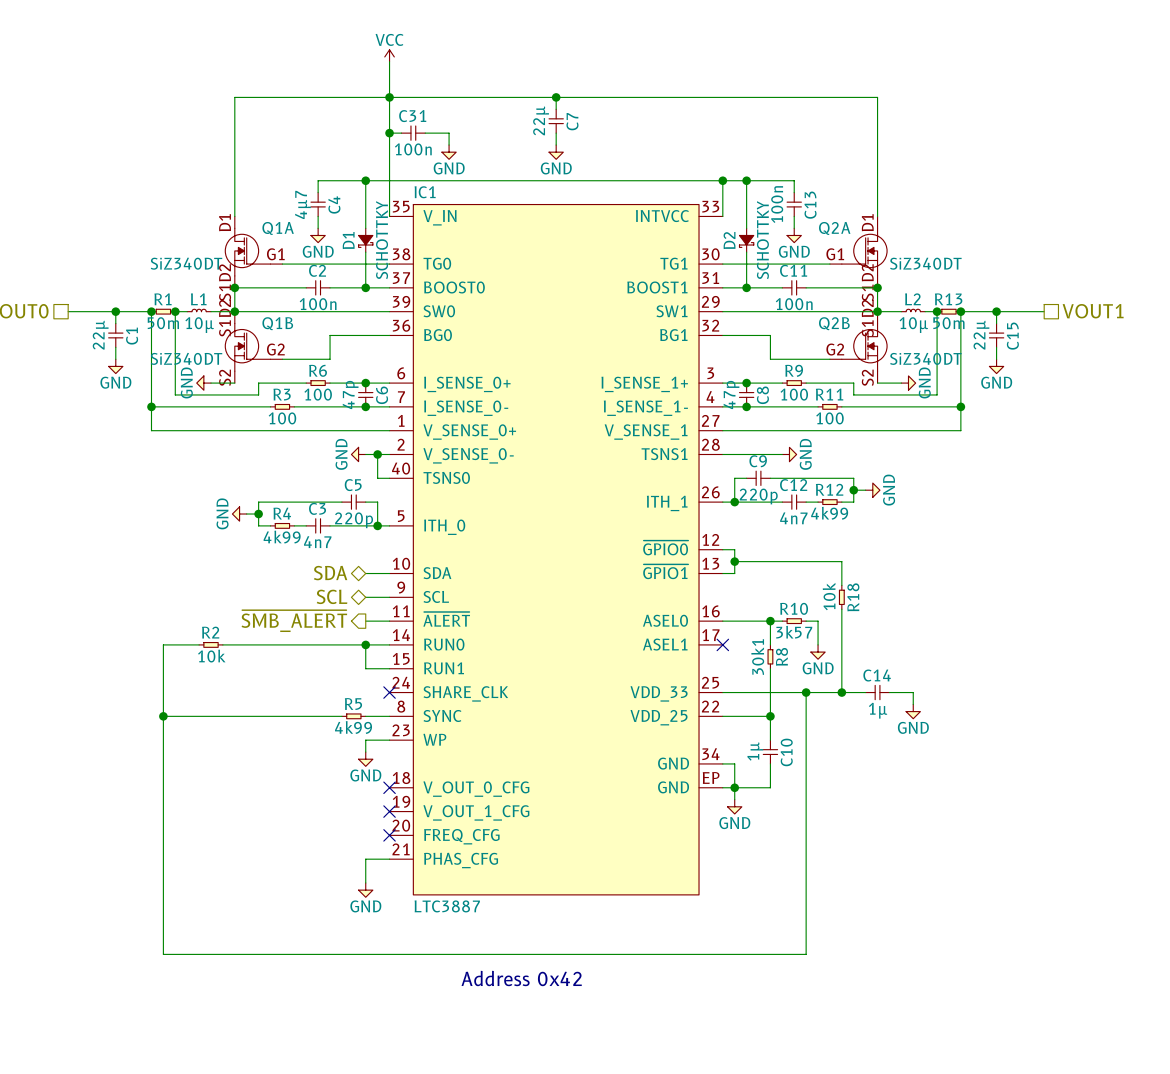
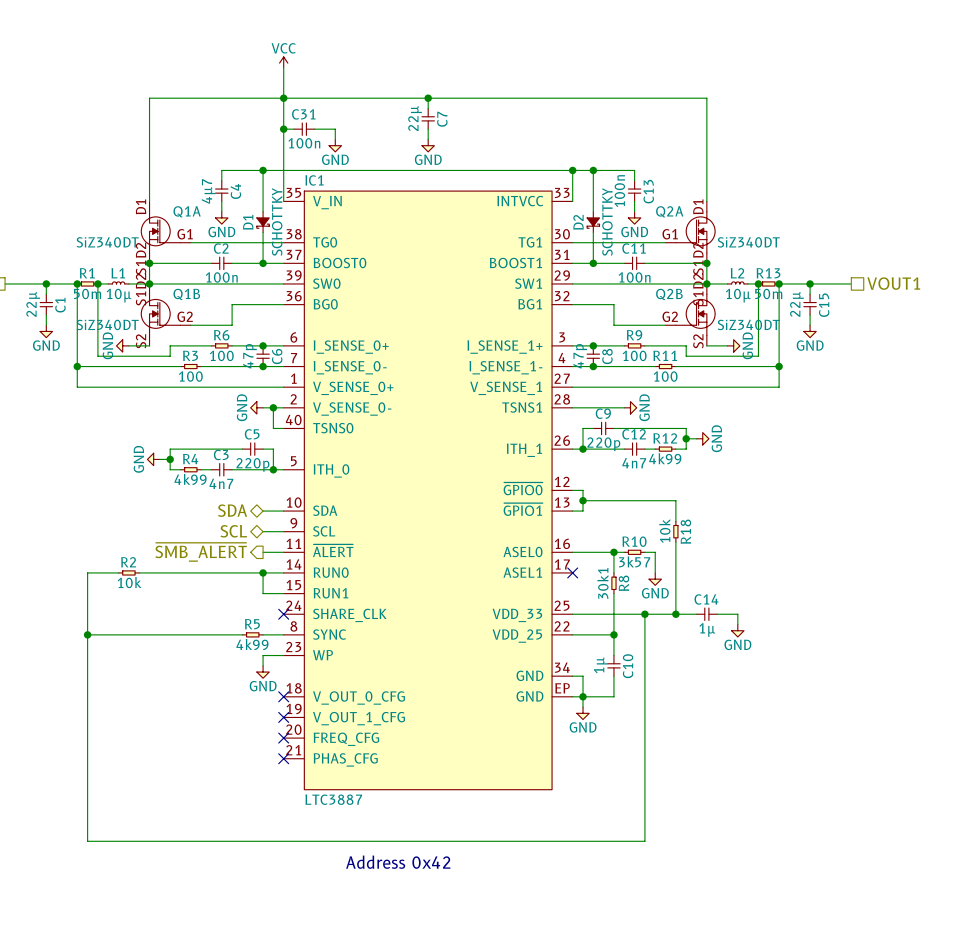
wire: (389, 859) (365, 859) (365, 882) -> none
no-connect mark: none -> (283, 758)
power symbol: GND (365, 890) -> none

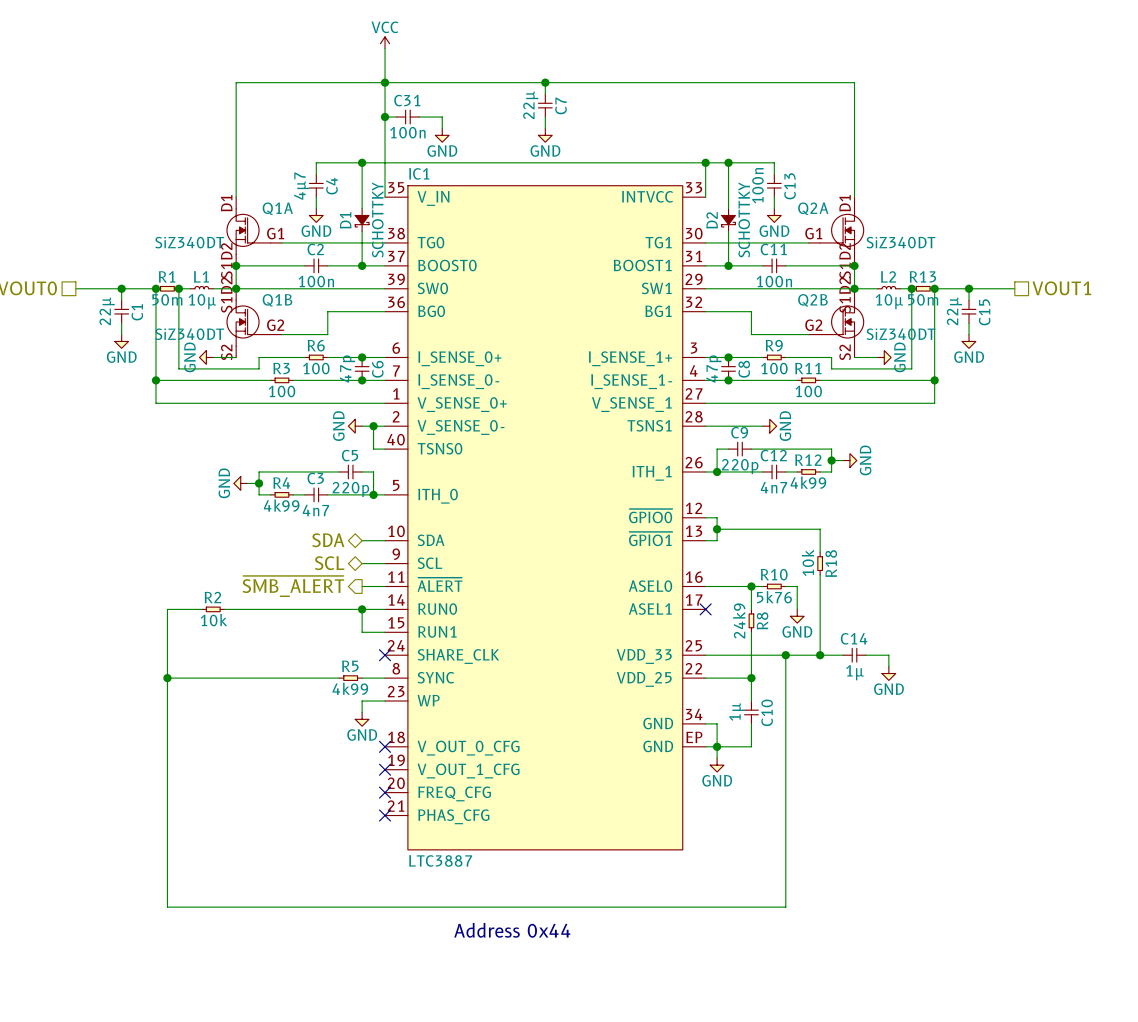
R10 value: 3k57 (634, 561) -> 5k76 (774, 597)
R8 value: 30k1 (602, 583) -> 24k9 (739, 620)
text: Address 0x42 (398, 862) -> Address 0x44 (512, 930)

